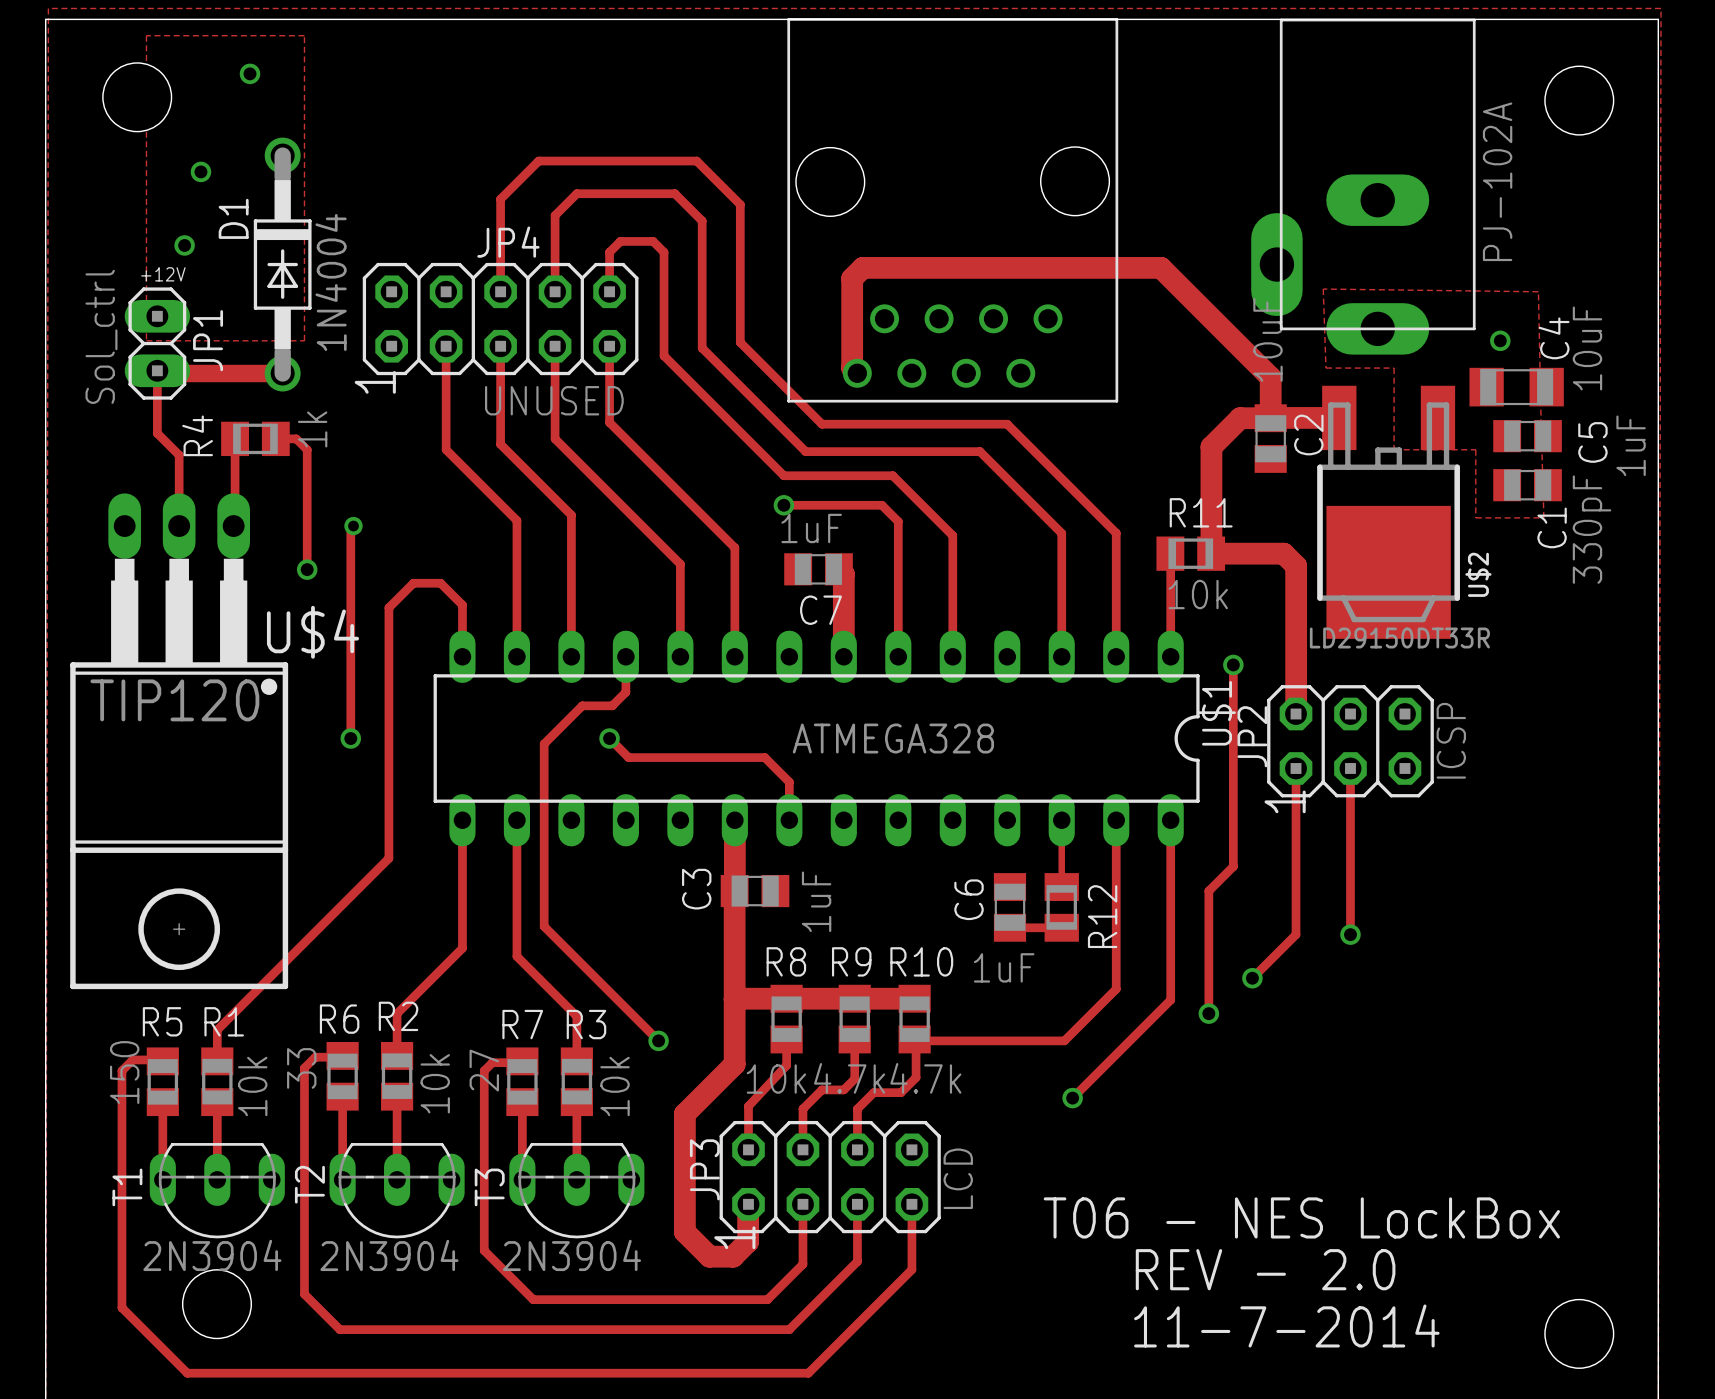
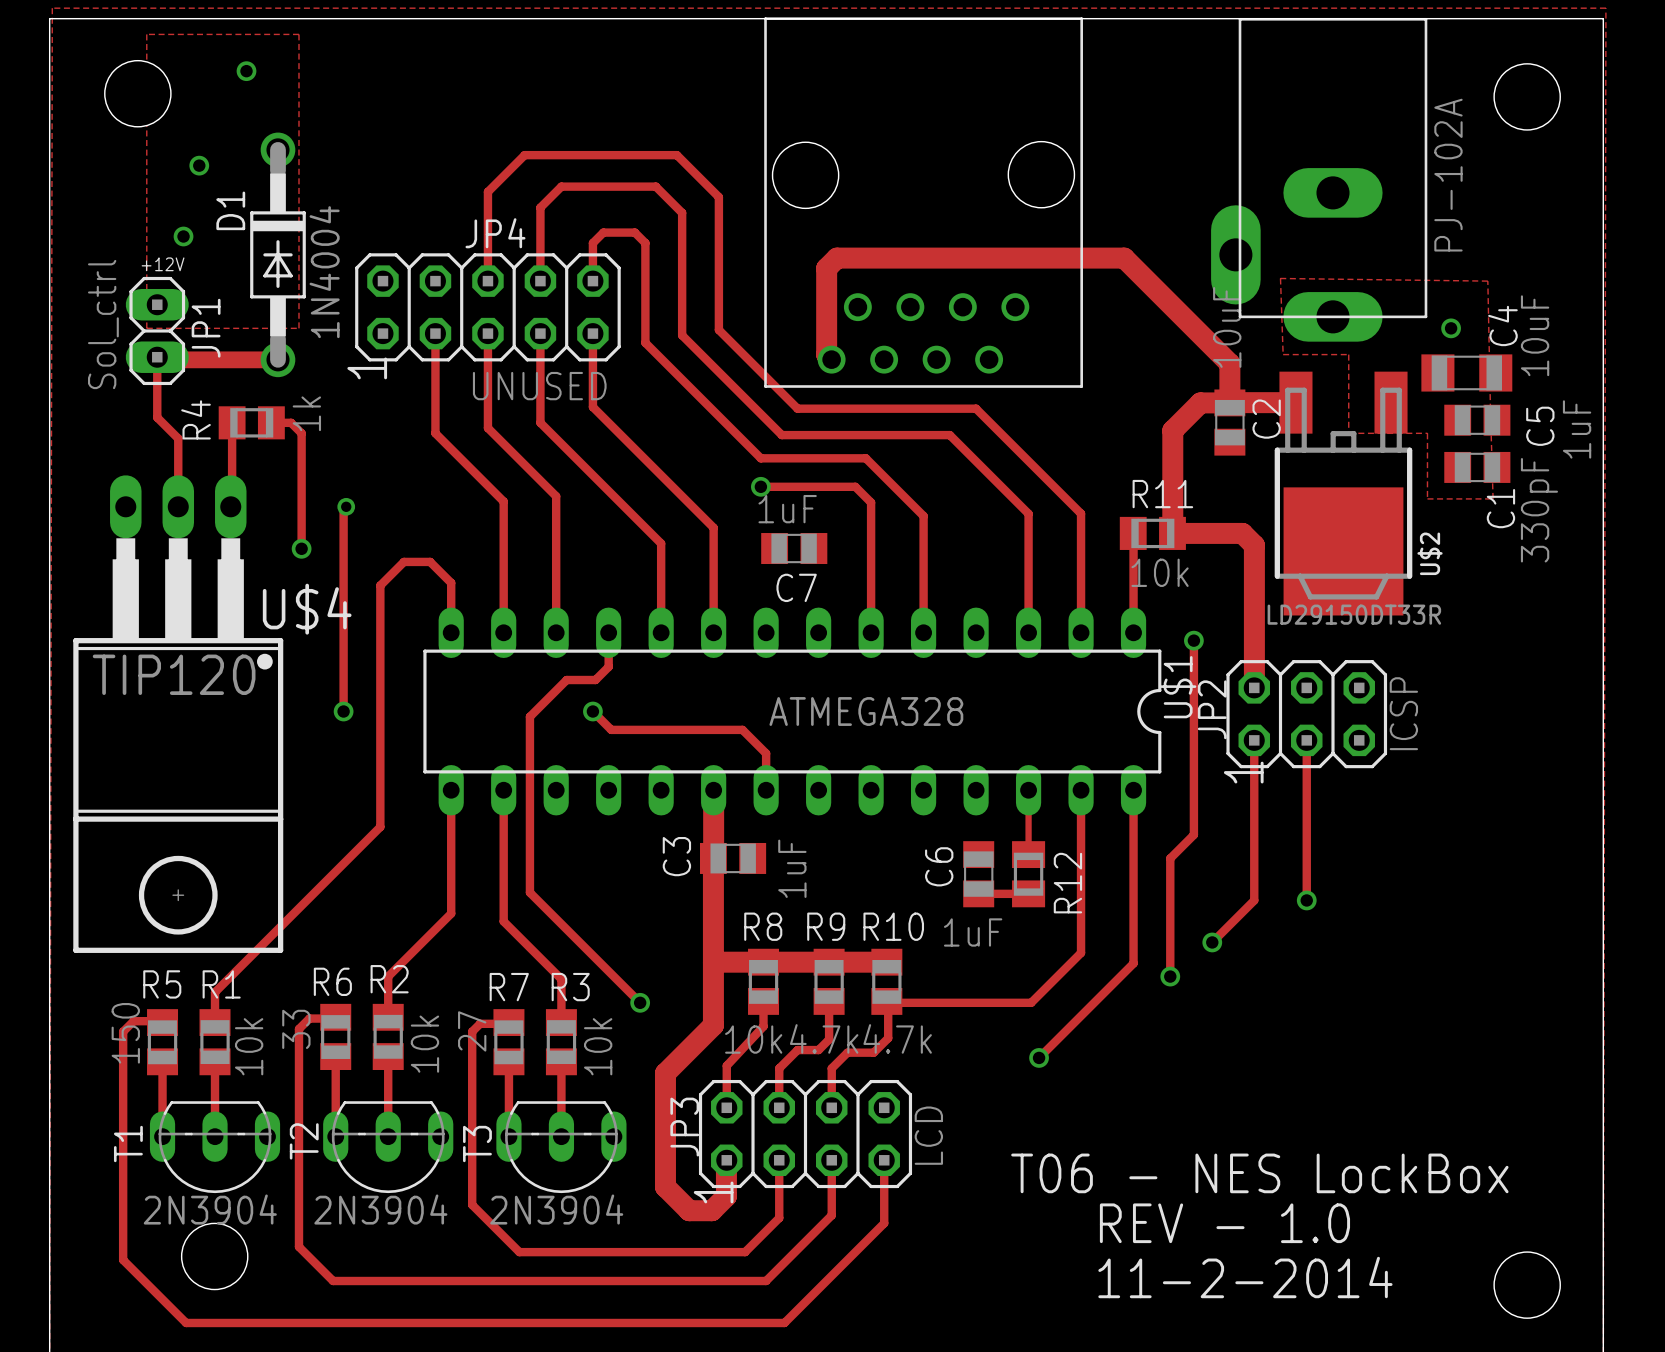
track: (838, 569) (843, 574) (843, 656) -> none
text: REV - 2.0 (1265, 1269) -> REV - 1.0 (1224, 1223)
text: 11-7-2014 (1286, 1325) -> 11-2-2014 (1245, 1277)

